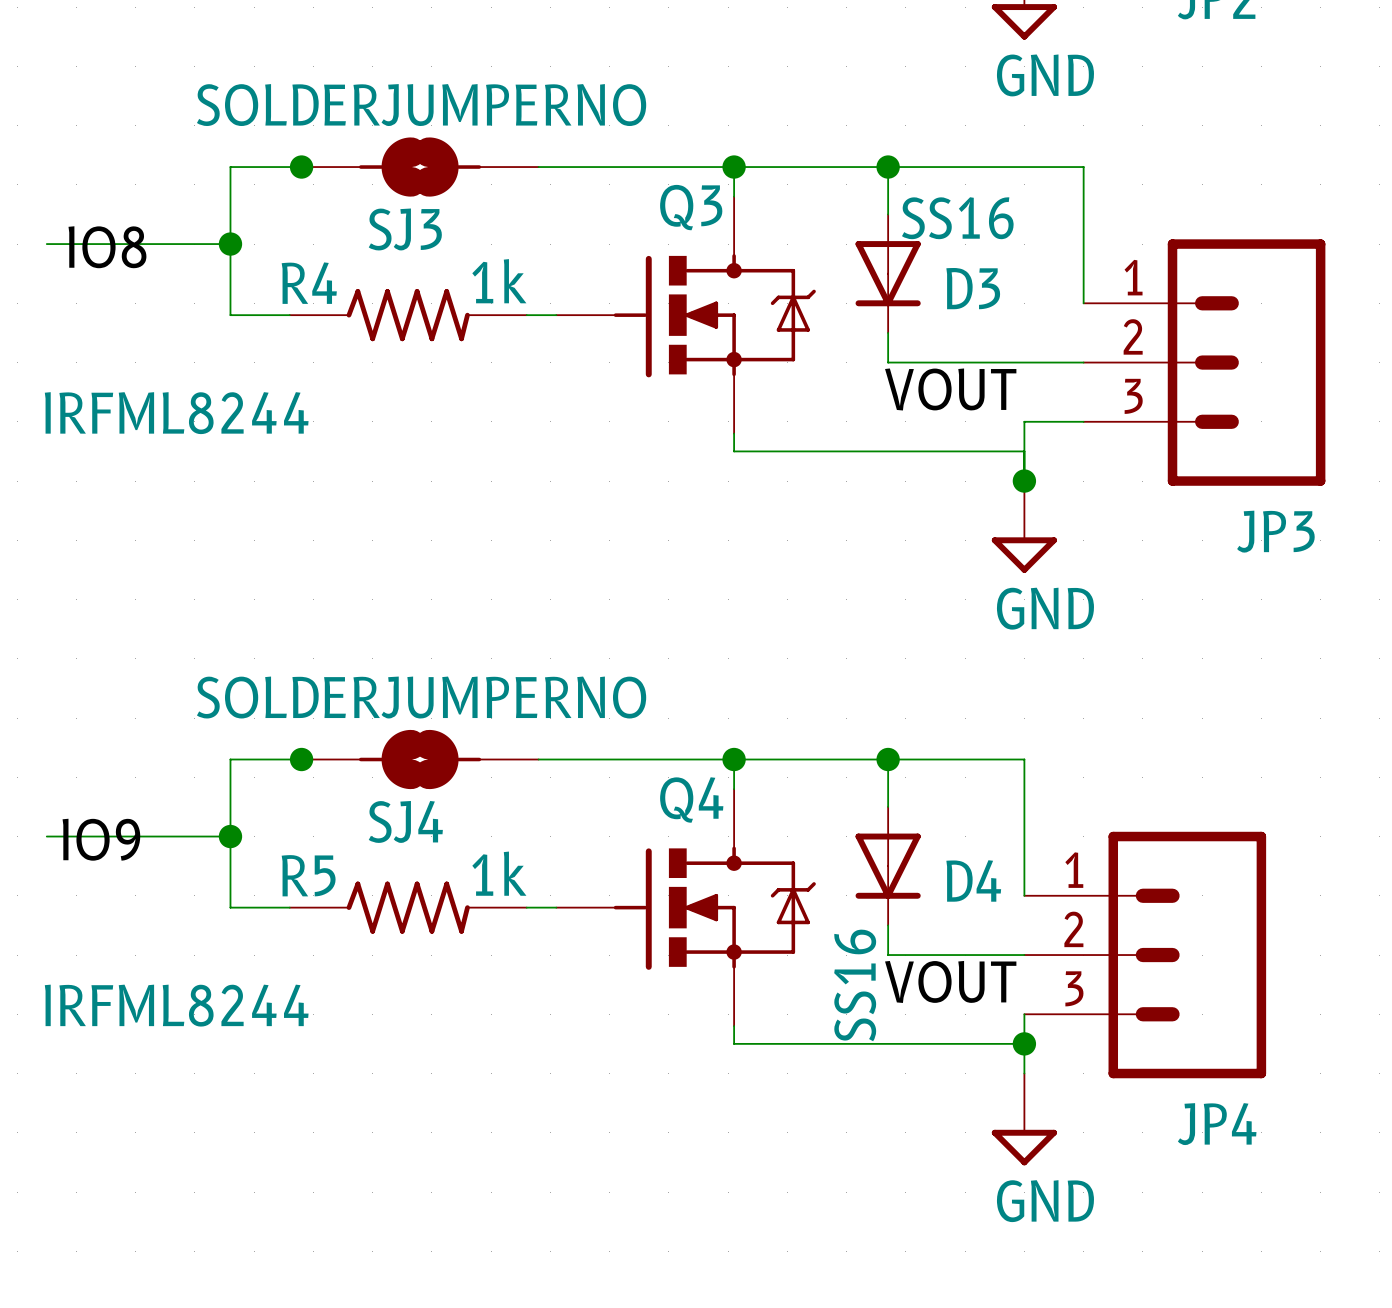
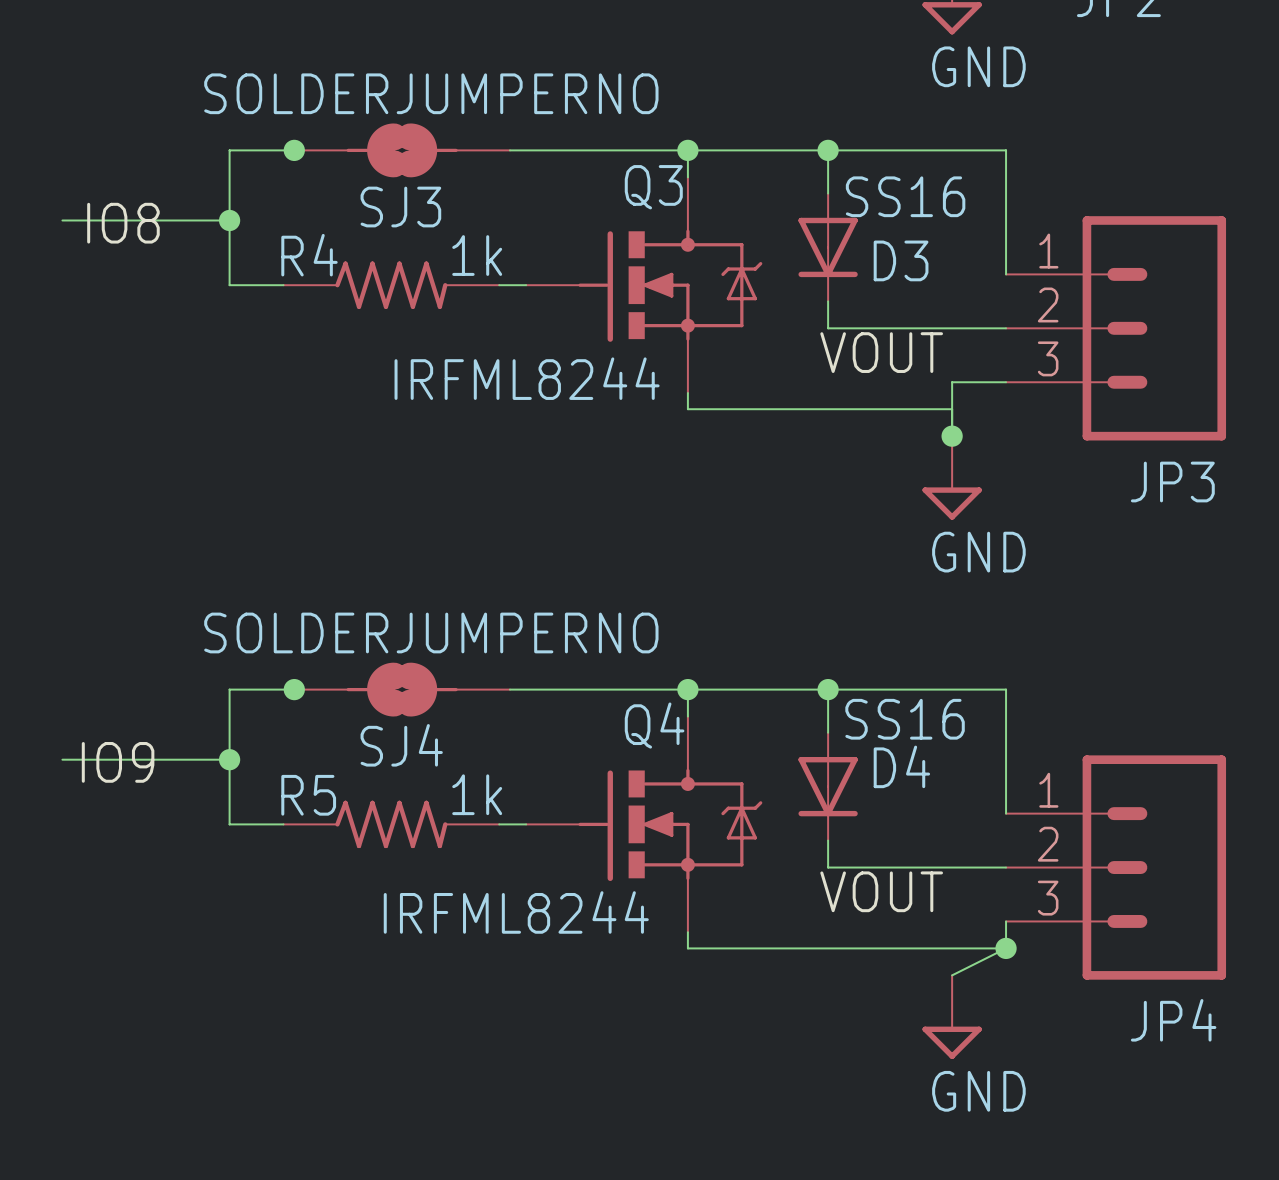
Q3 value position: IRFML8244 (176, 413) -> IRFML8244 (527, 378)
wire: (1024, 759) (1024, 895) -> (952, 689) (1006, 689) (1006, 813)
D4 name position: D4 (973, 880) -> D4 (901, 766)
JP4 position: (1145, 955) -> (1116, 867)
D4 value rotation: 0° (855, 985) -> 90° clockwise (905, 719)
D4 value position: SS16 (855, 985) -> SS16 (905, 719)
Q4 value position: IRFML8244 (176, 1005) -> IRFML8244 (516, 912)
wire: (1024, 1014) (1024, 1073) -> (1006, 948) (952, 975)
wire: none -> (1006, 921) (1006, 948)
wire: none -> (952, 948) (1006, 948)
junction position: (1024, 1043) -> (1006, 948)

